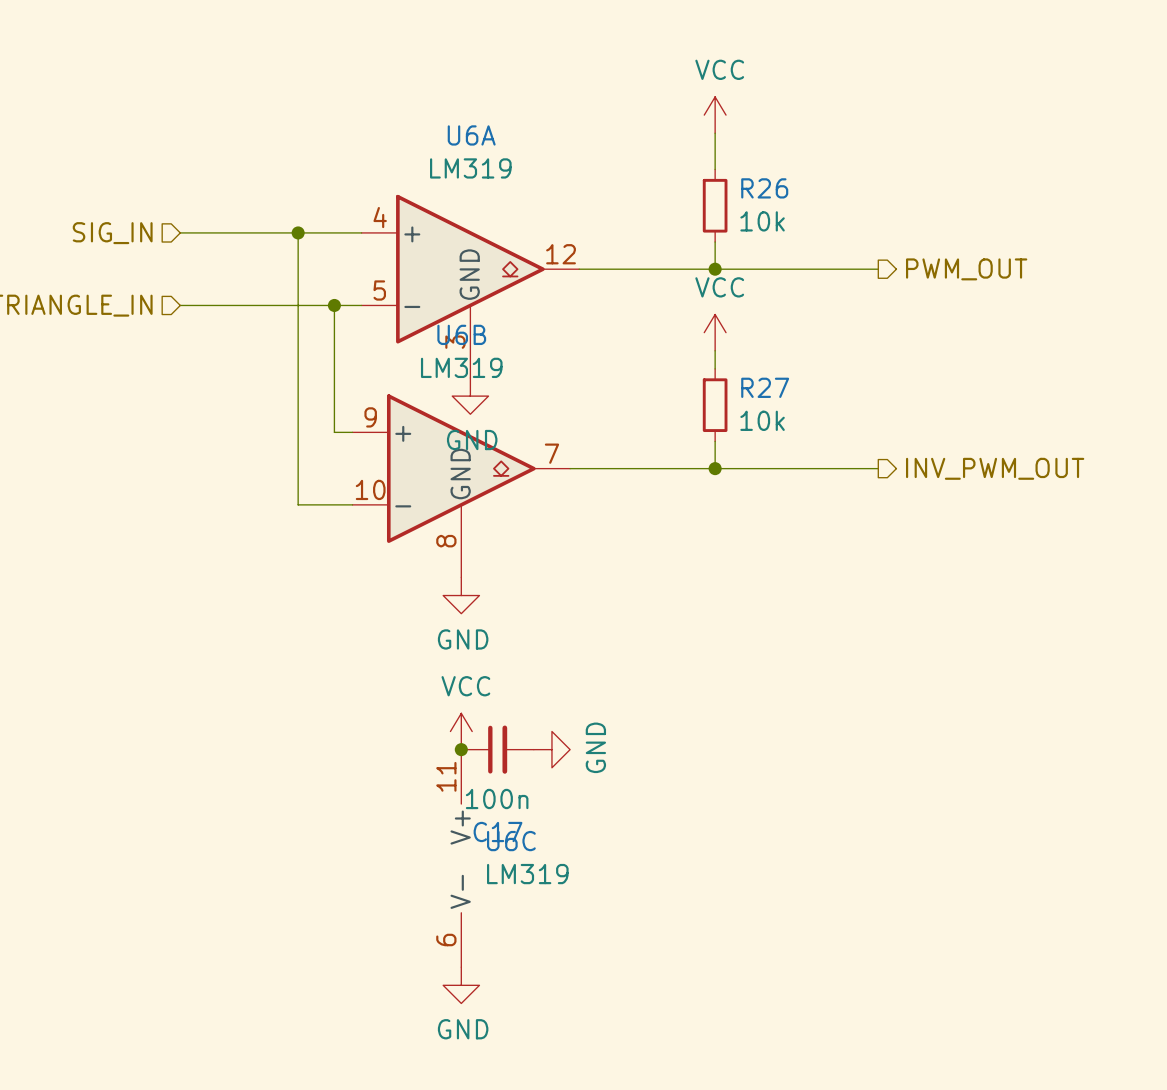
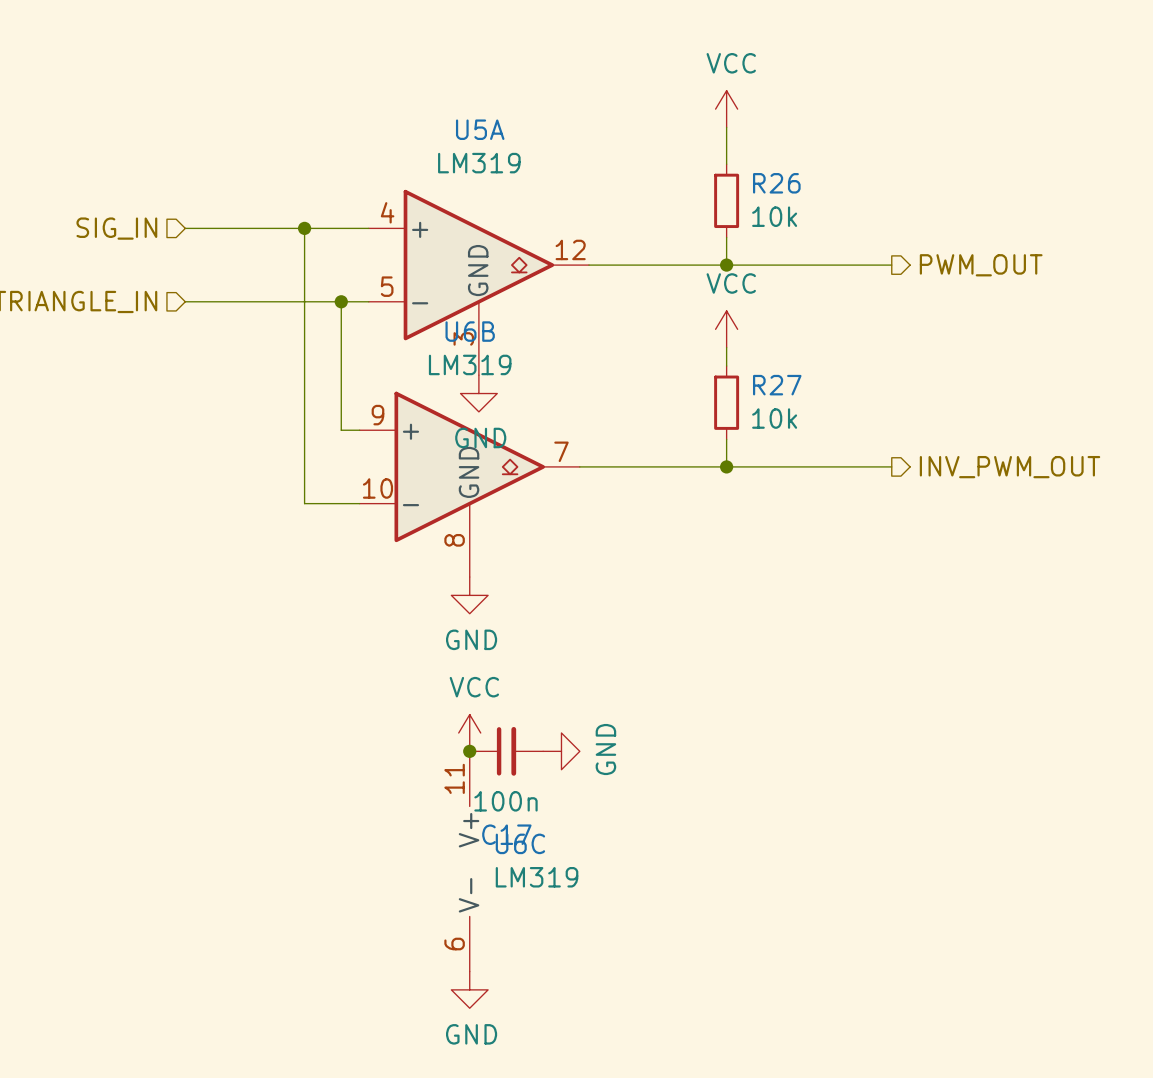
U6A name: U6A (471, 135) -> U5A (480, 129)

